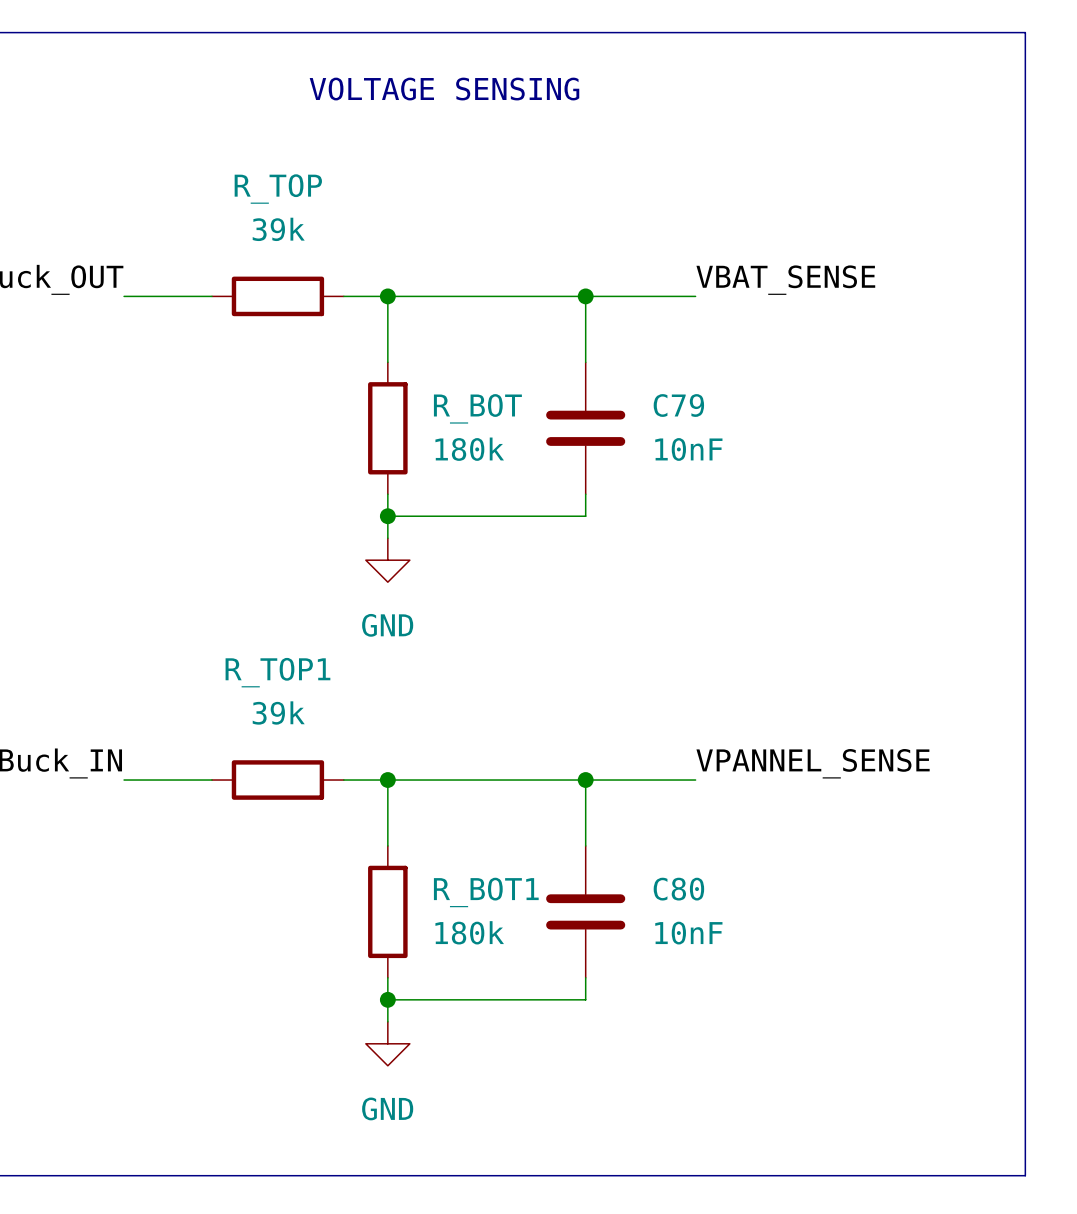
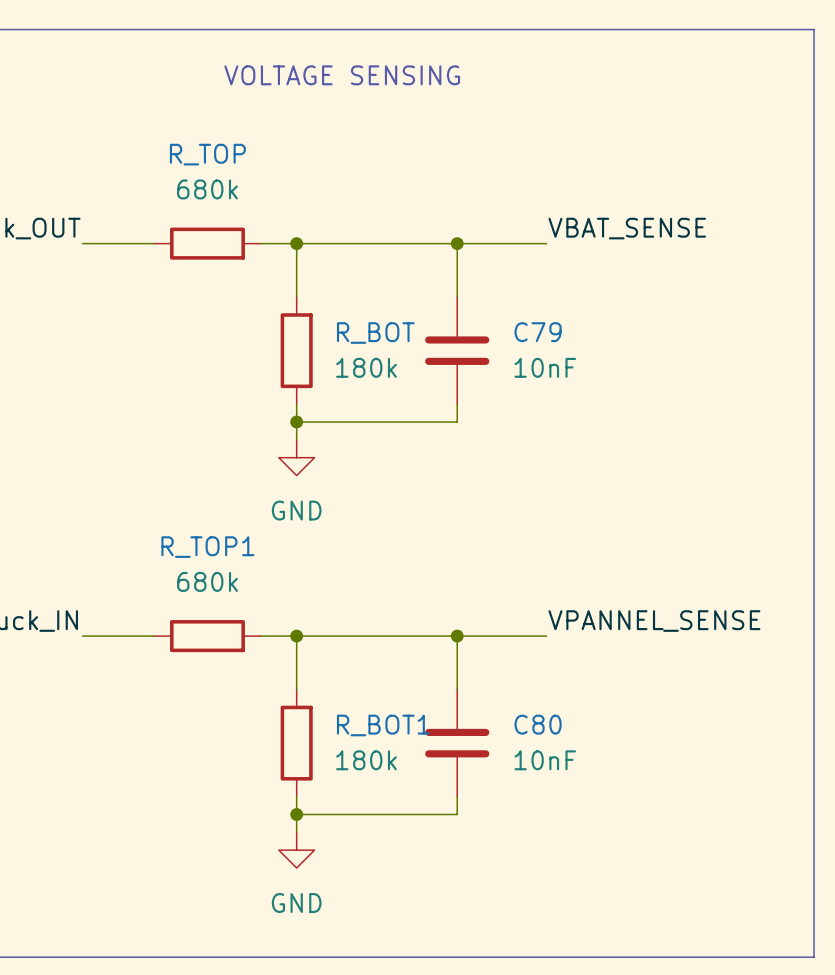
R_TOP value: 39k (278, 229) -> 680k (207, 189)
R_TOP1 value: 39k (278, 712) -> 680k (207, 581)

